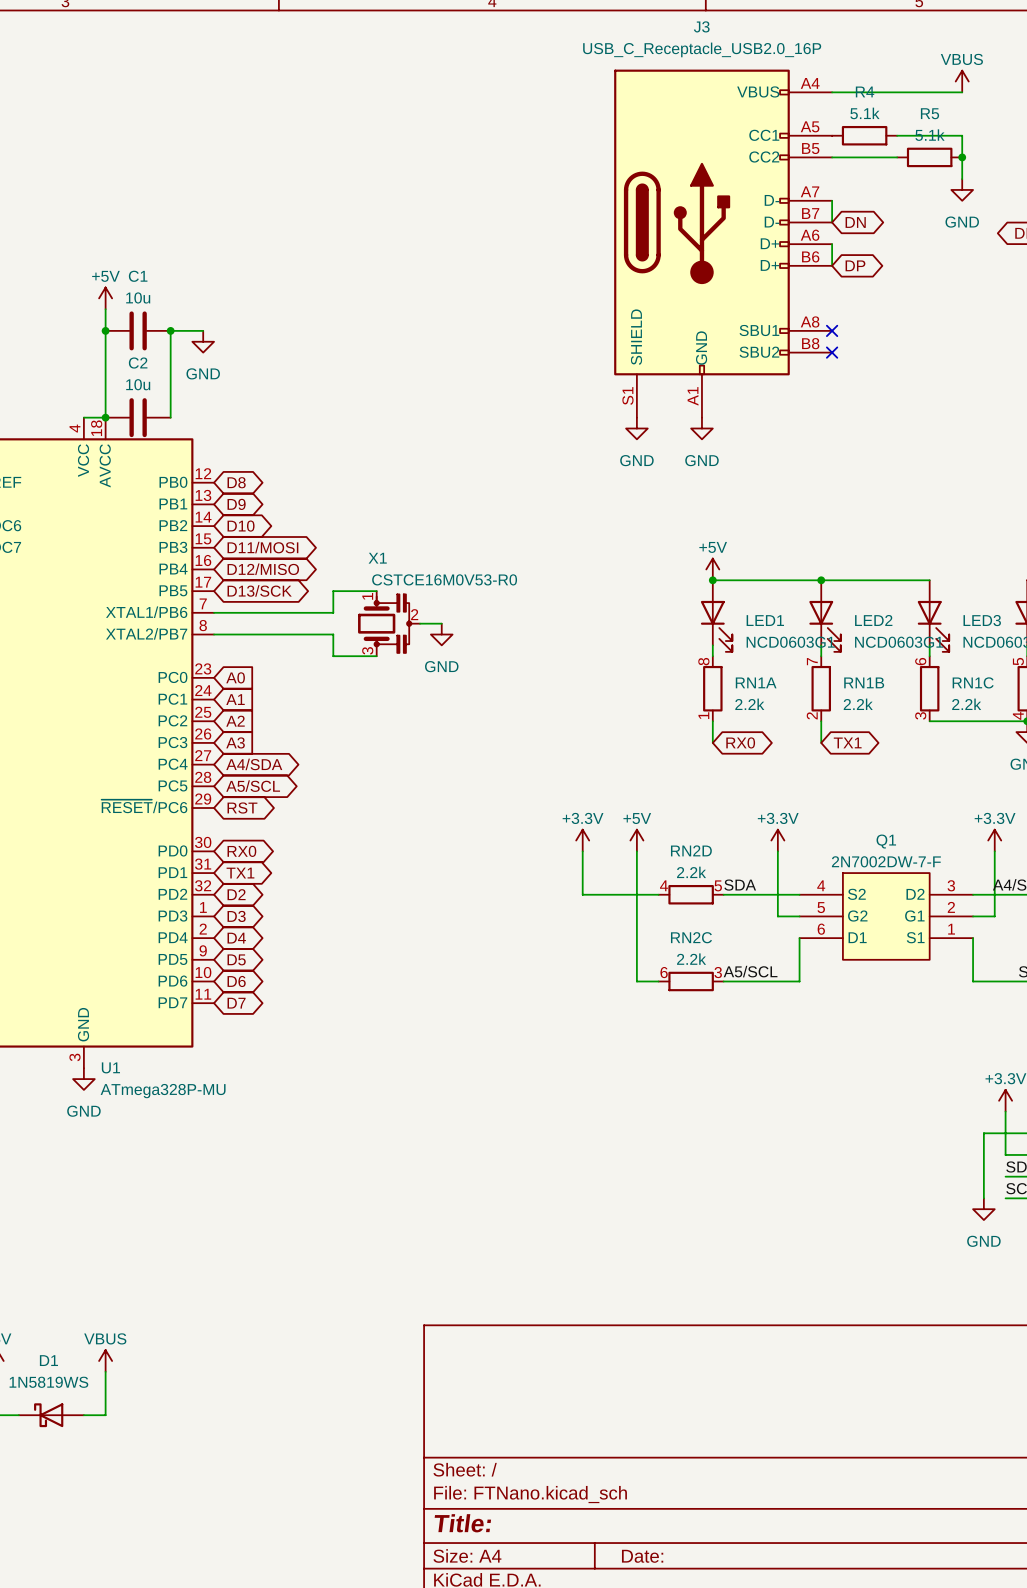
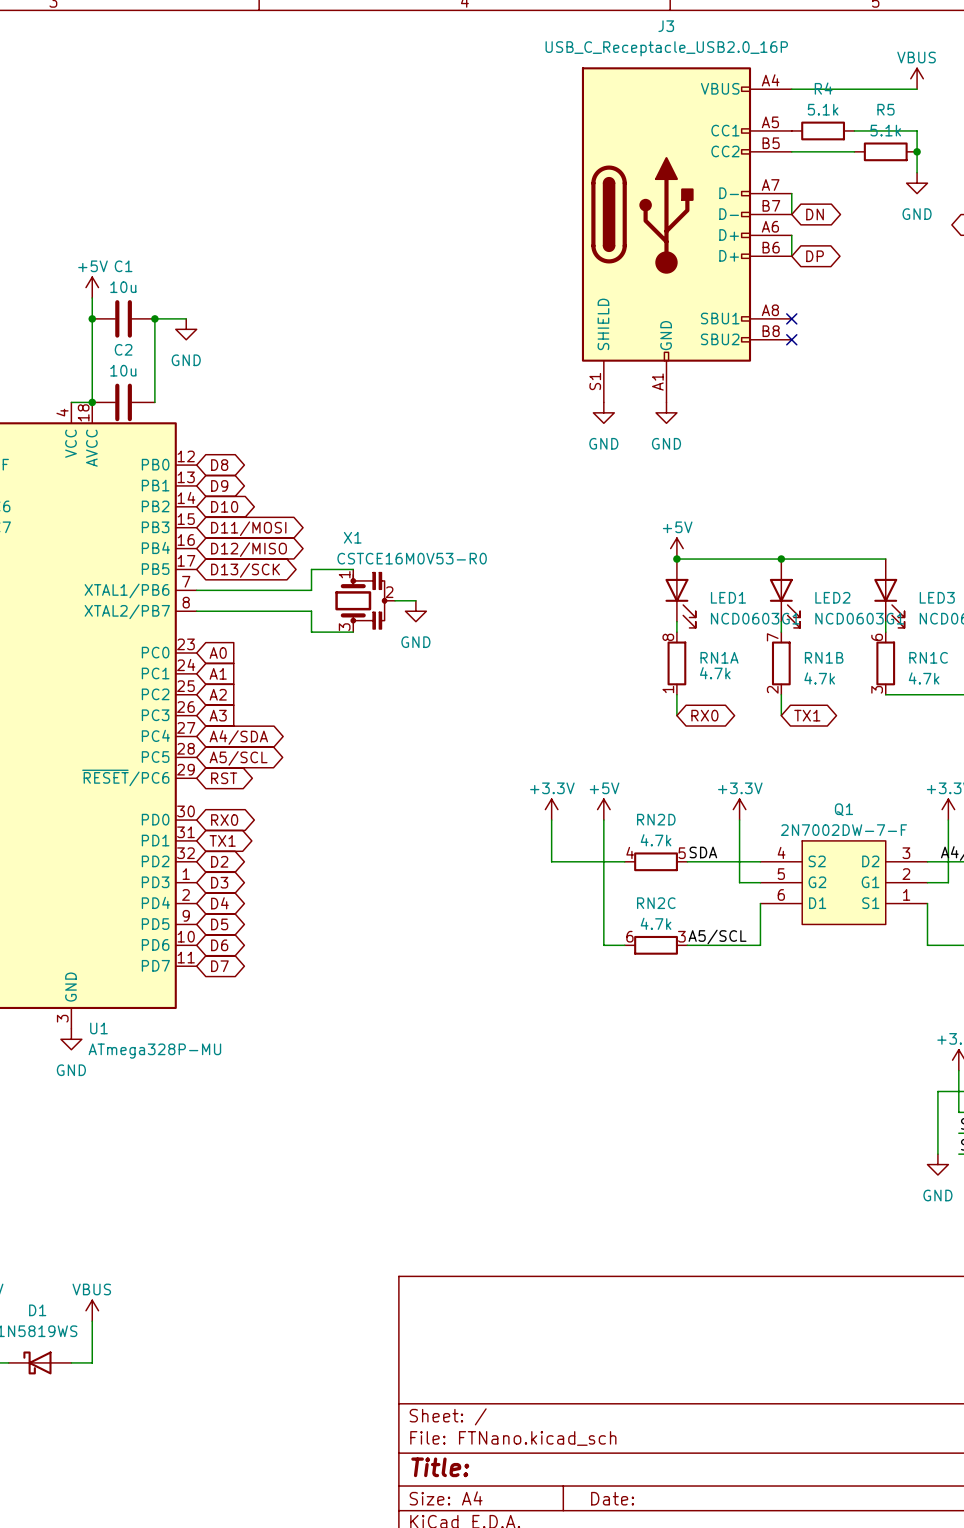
RN1A value: 2.2k (749, 704) -> 4.7k (715, 673)
RN1B value: 2.2k (858, 704) -> 4.7k (819, 678)
RN1C value: 2.2k (966, 704) -> 4.7k (924, 678)
RN2D value: 2.2k (691, 872) -> 4.7k (656, 840)
RN2C value: 2.2k (691, 959) -> 4.7k (656, 923)

